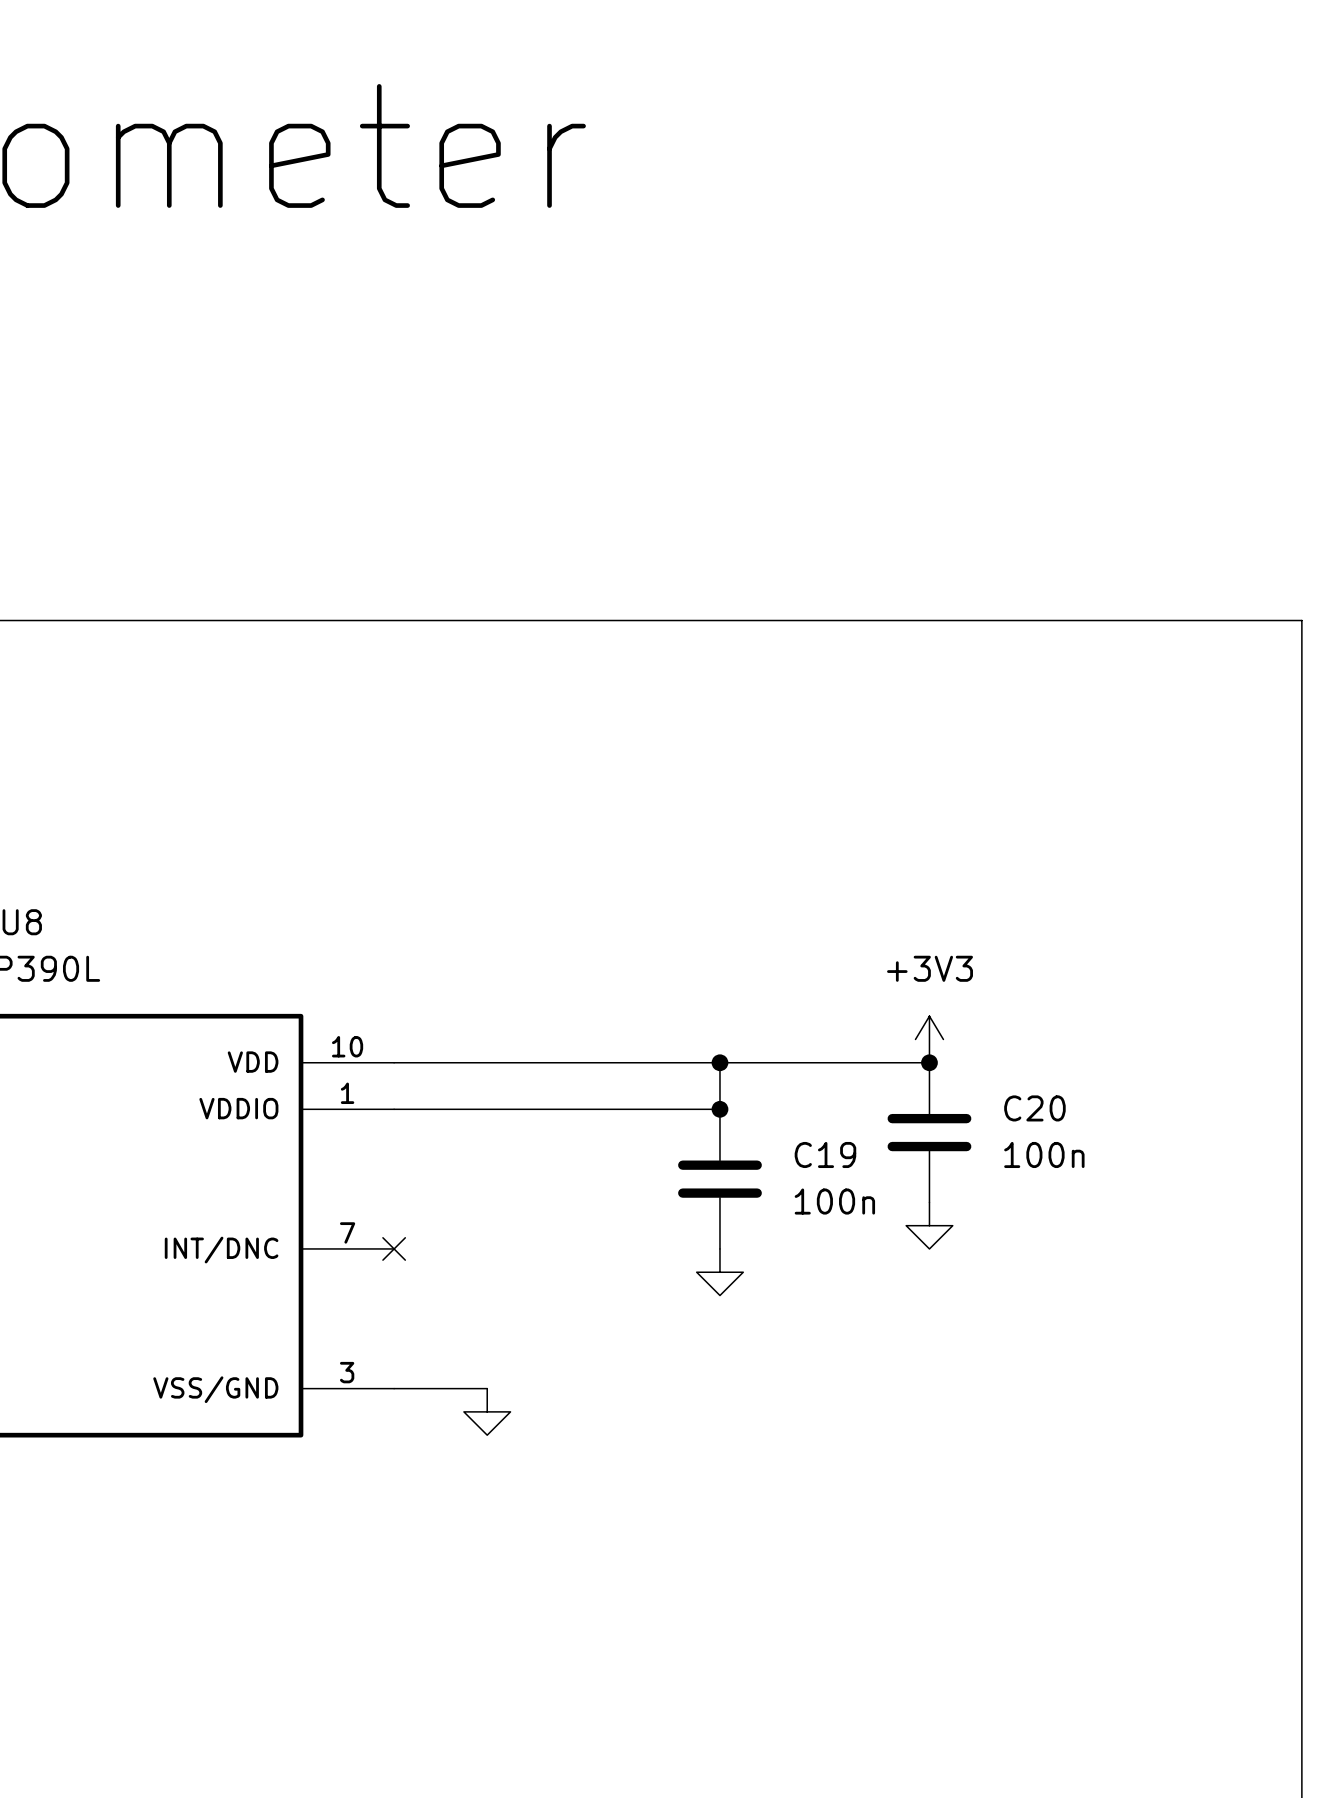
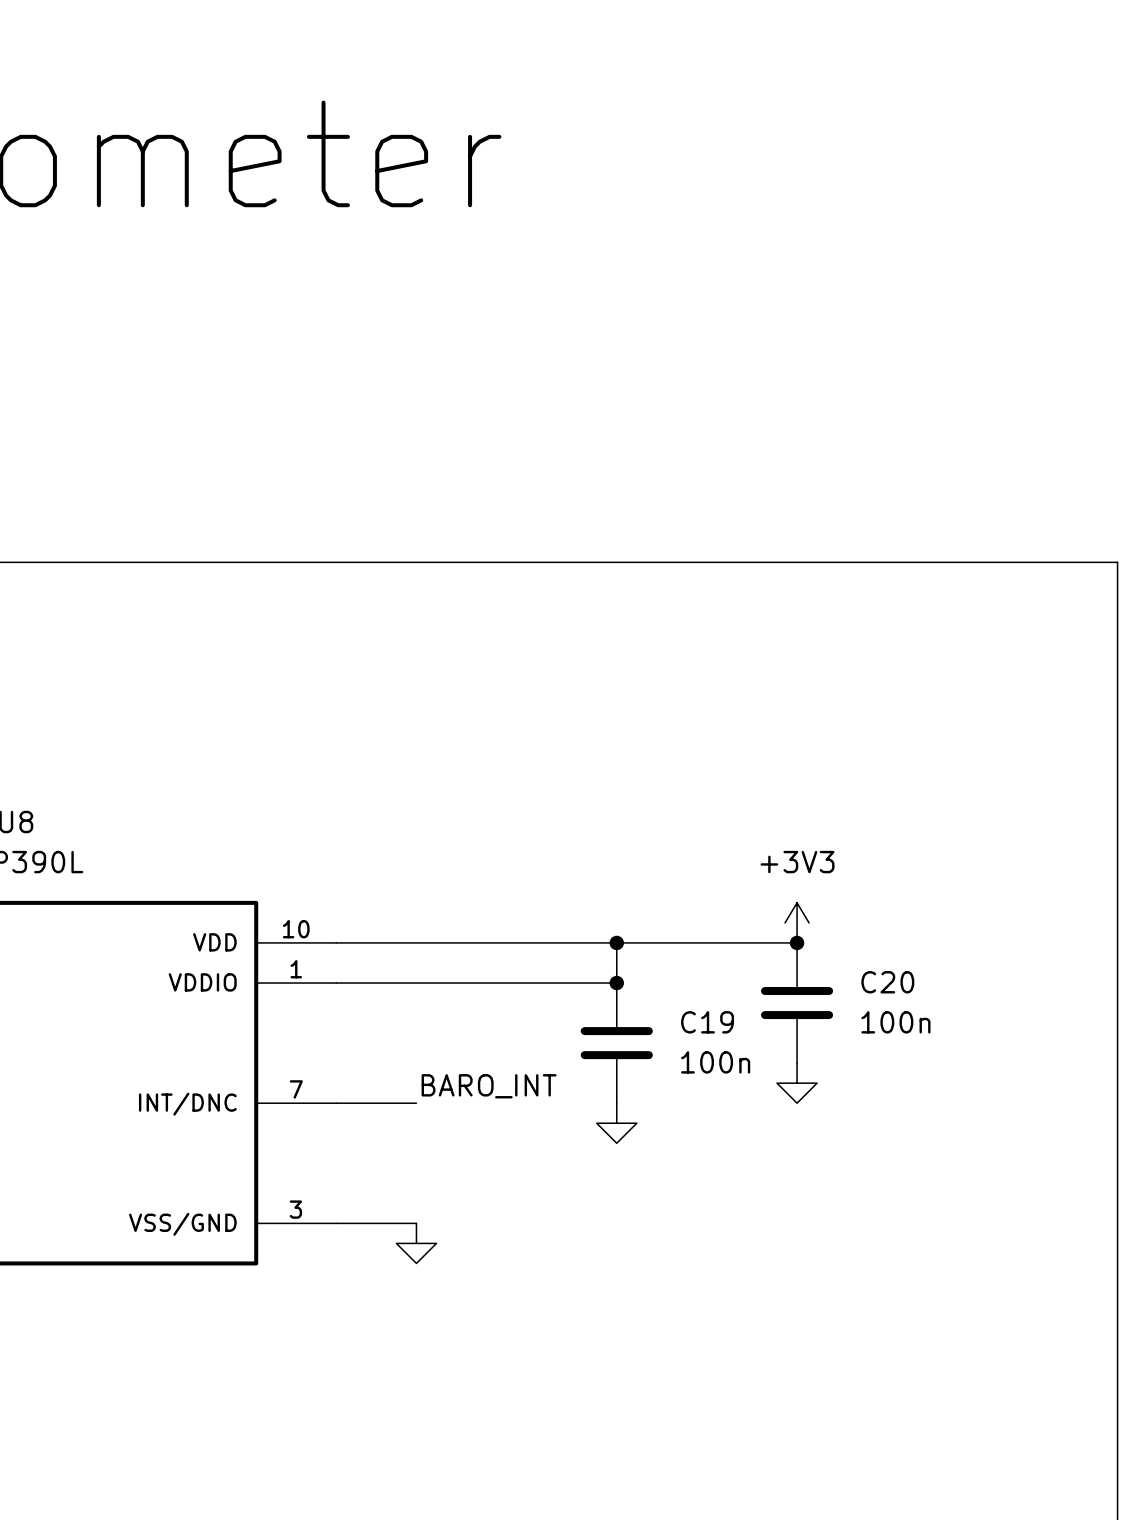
label: none -> BARO_INT (489, 1086)
wire: none -> (336, 1103) (416, 1103)
no-connect mark: (394, 1248) -> none

